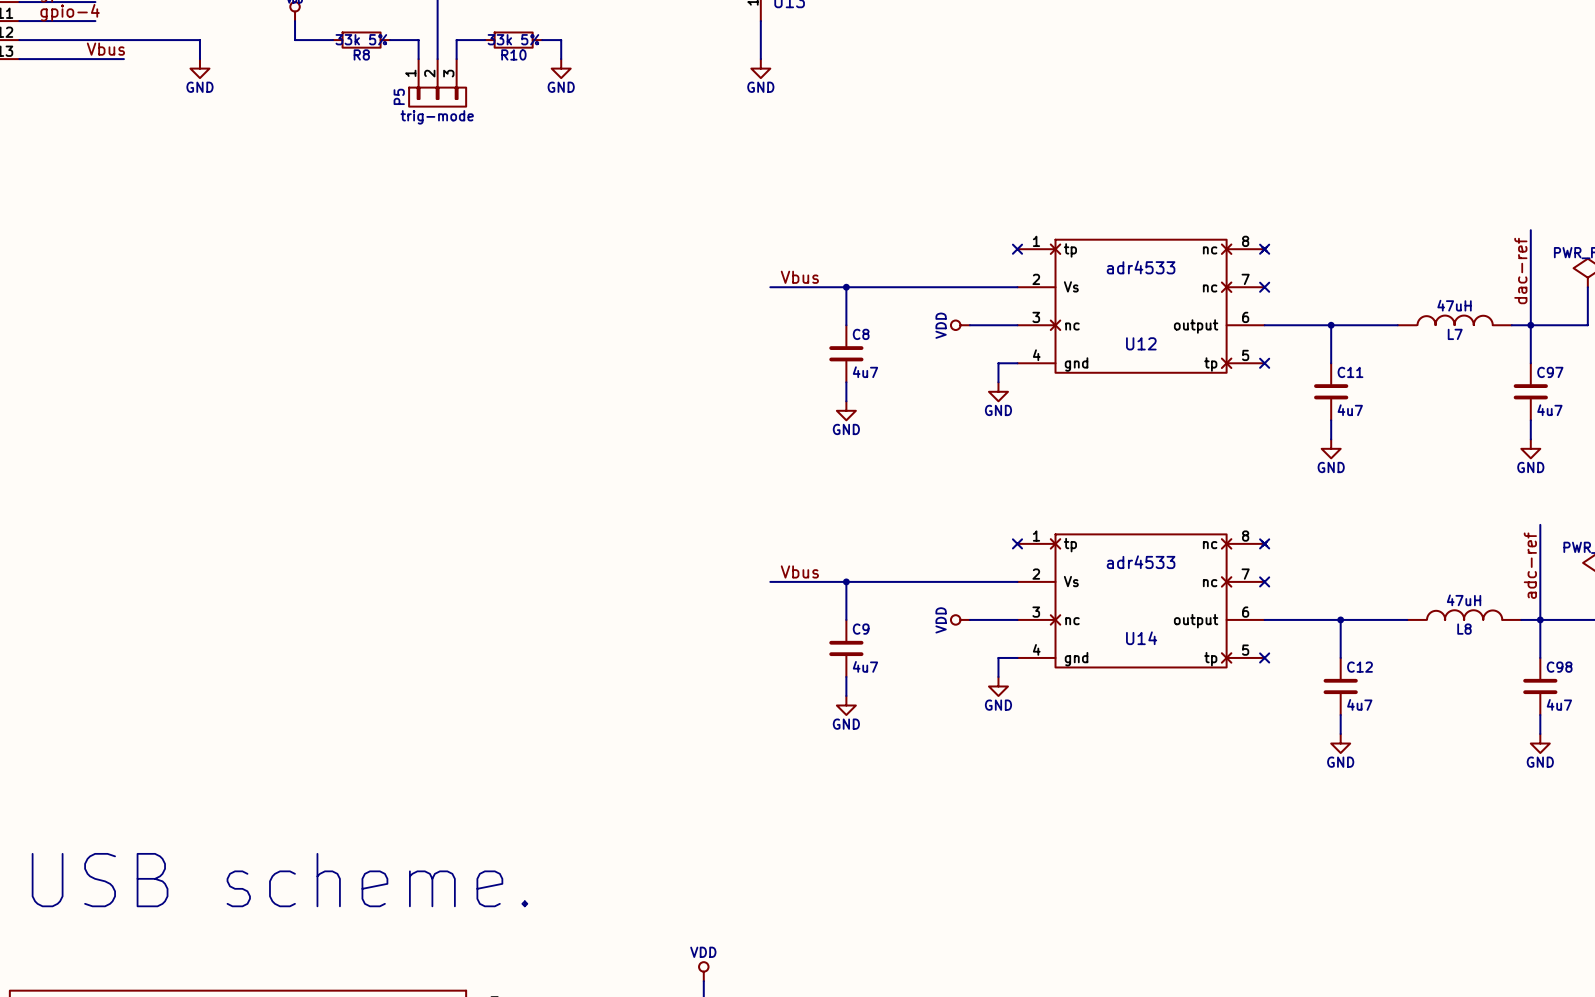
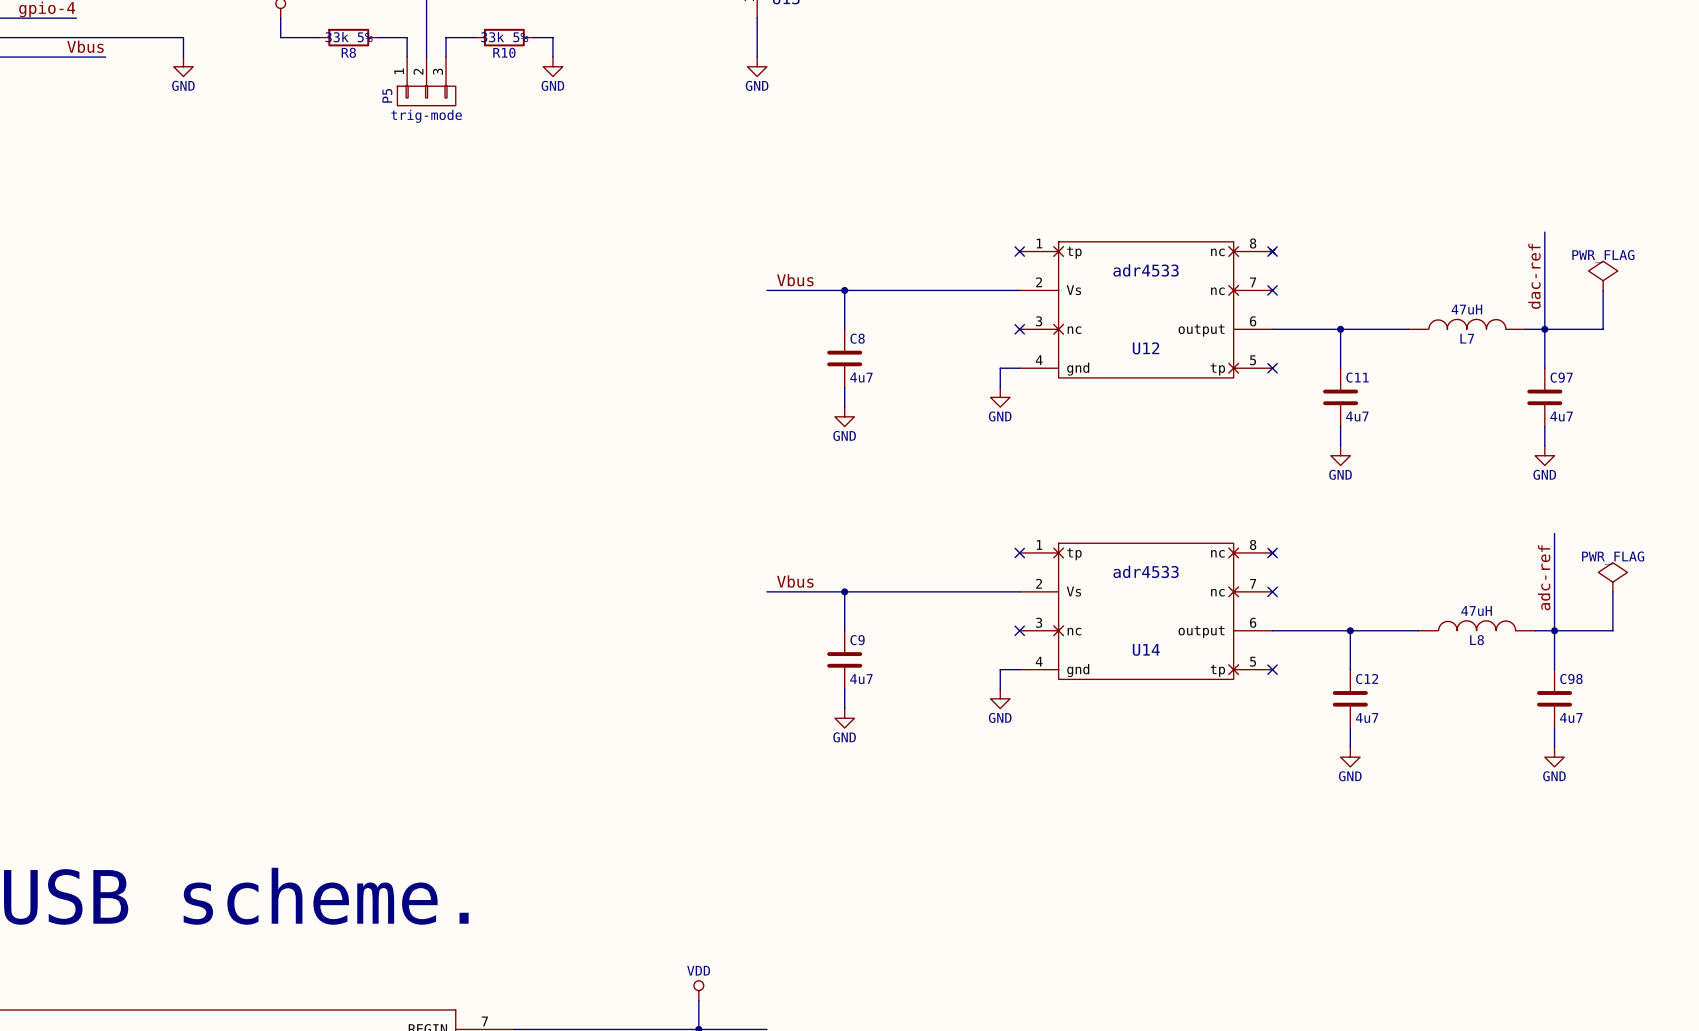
power symbol: VDD (960, 325) -> none
wire: (969, 325) (1017, 325) -> none
no-connect mark: none -> (1019, 329)
power symbol: VDD (960, 619) -> none
wire: (969, 619) (1017, 619) -> none
no-connect mark: none -> (1019, 630)

